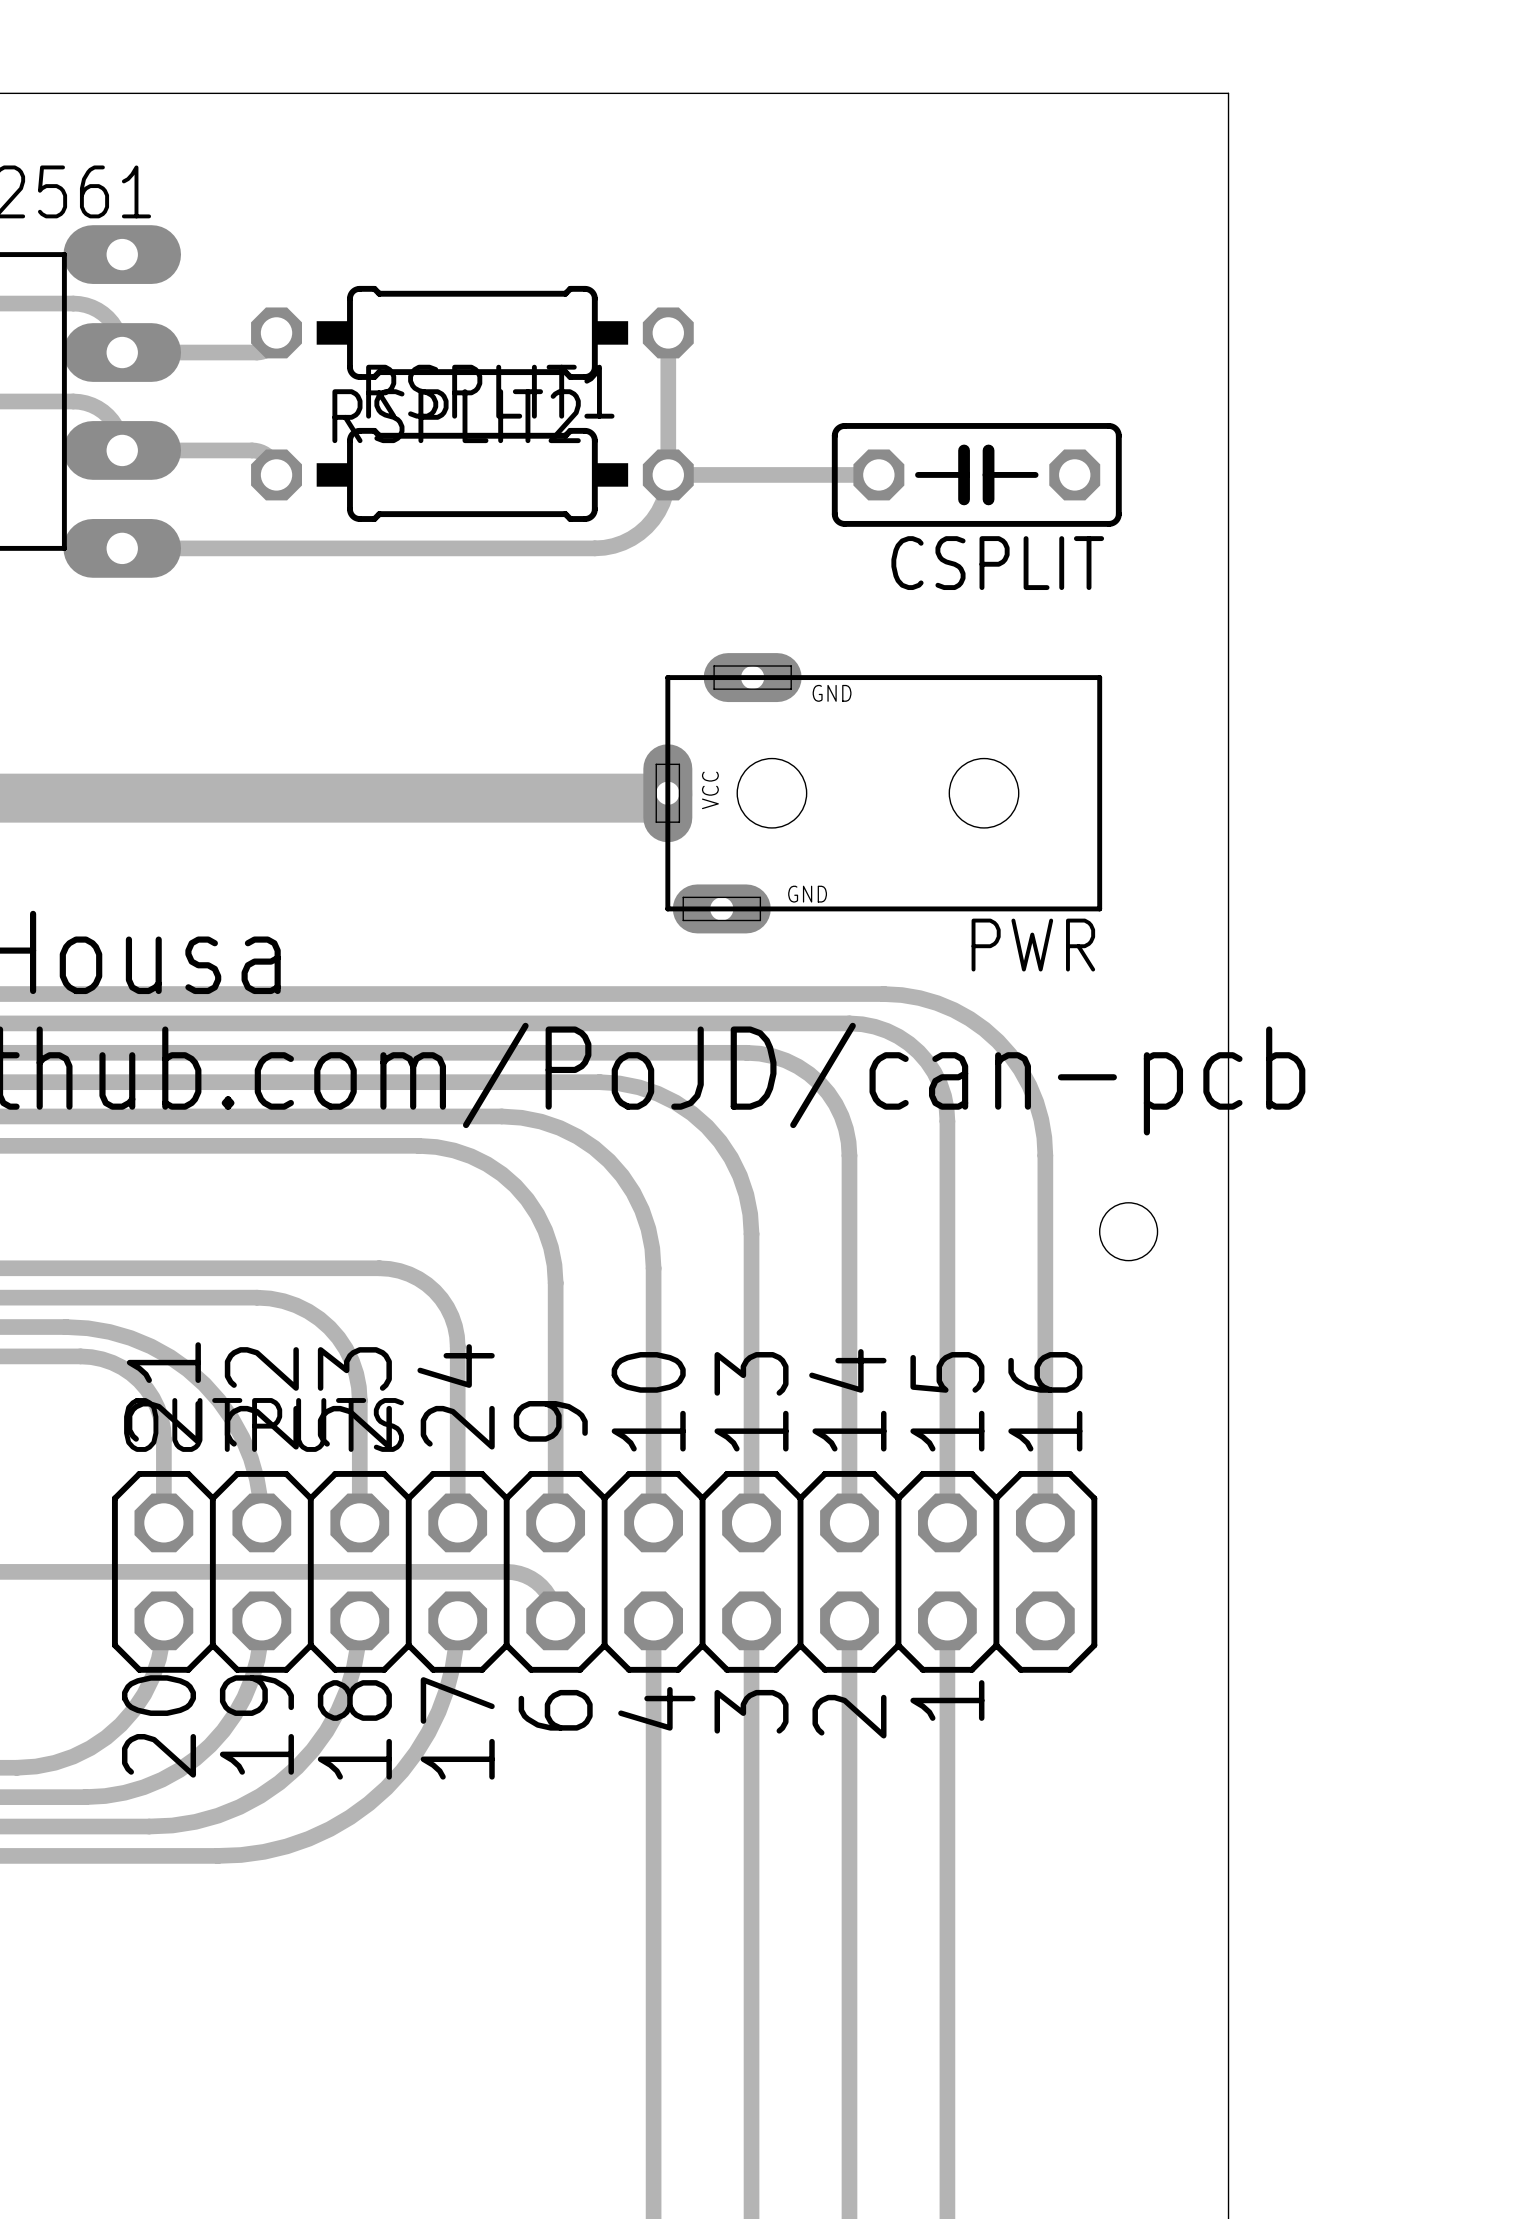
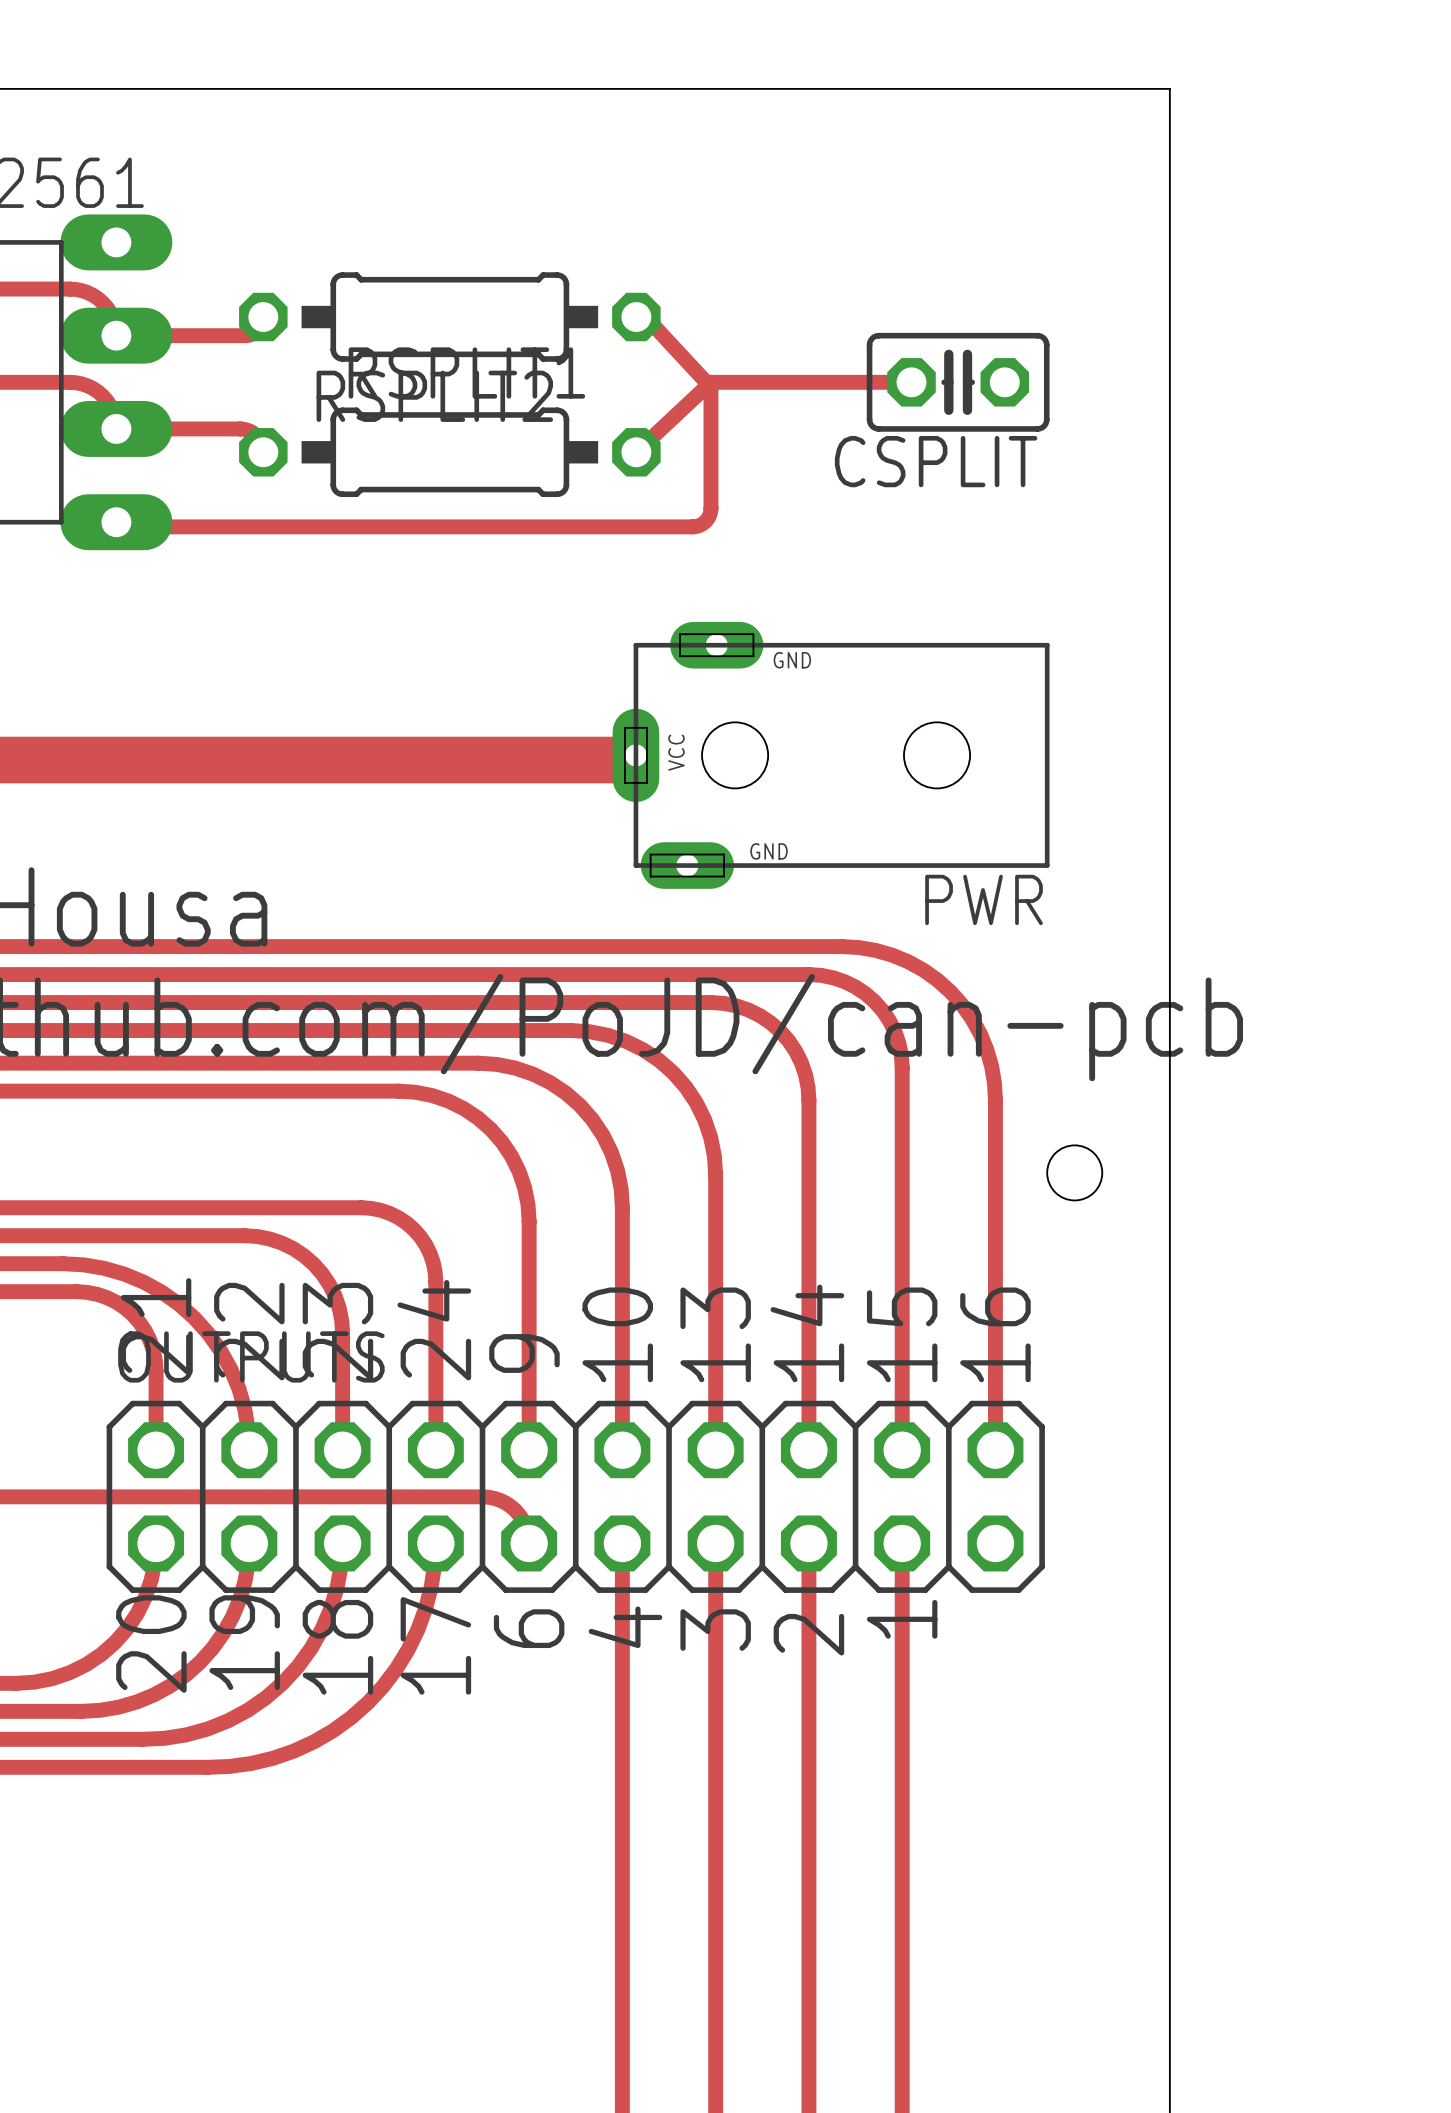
track: (668, 332) (668, 474) -> none
track: none -> (645, 317) (706, 382) (911, 382)
CSPLIT: none -> (958, 382)
track: (668, 474) (662, 503) (646, 526) (622, 542) (604, 547) (122, 548) -> (636, 452) (711, 382) (710, 510) (707, 519) (697, 526) (121, 526) (116, 522)
track: (668, 474) (878, 474) -> none
CSPLIT: (976, 474) -> none

